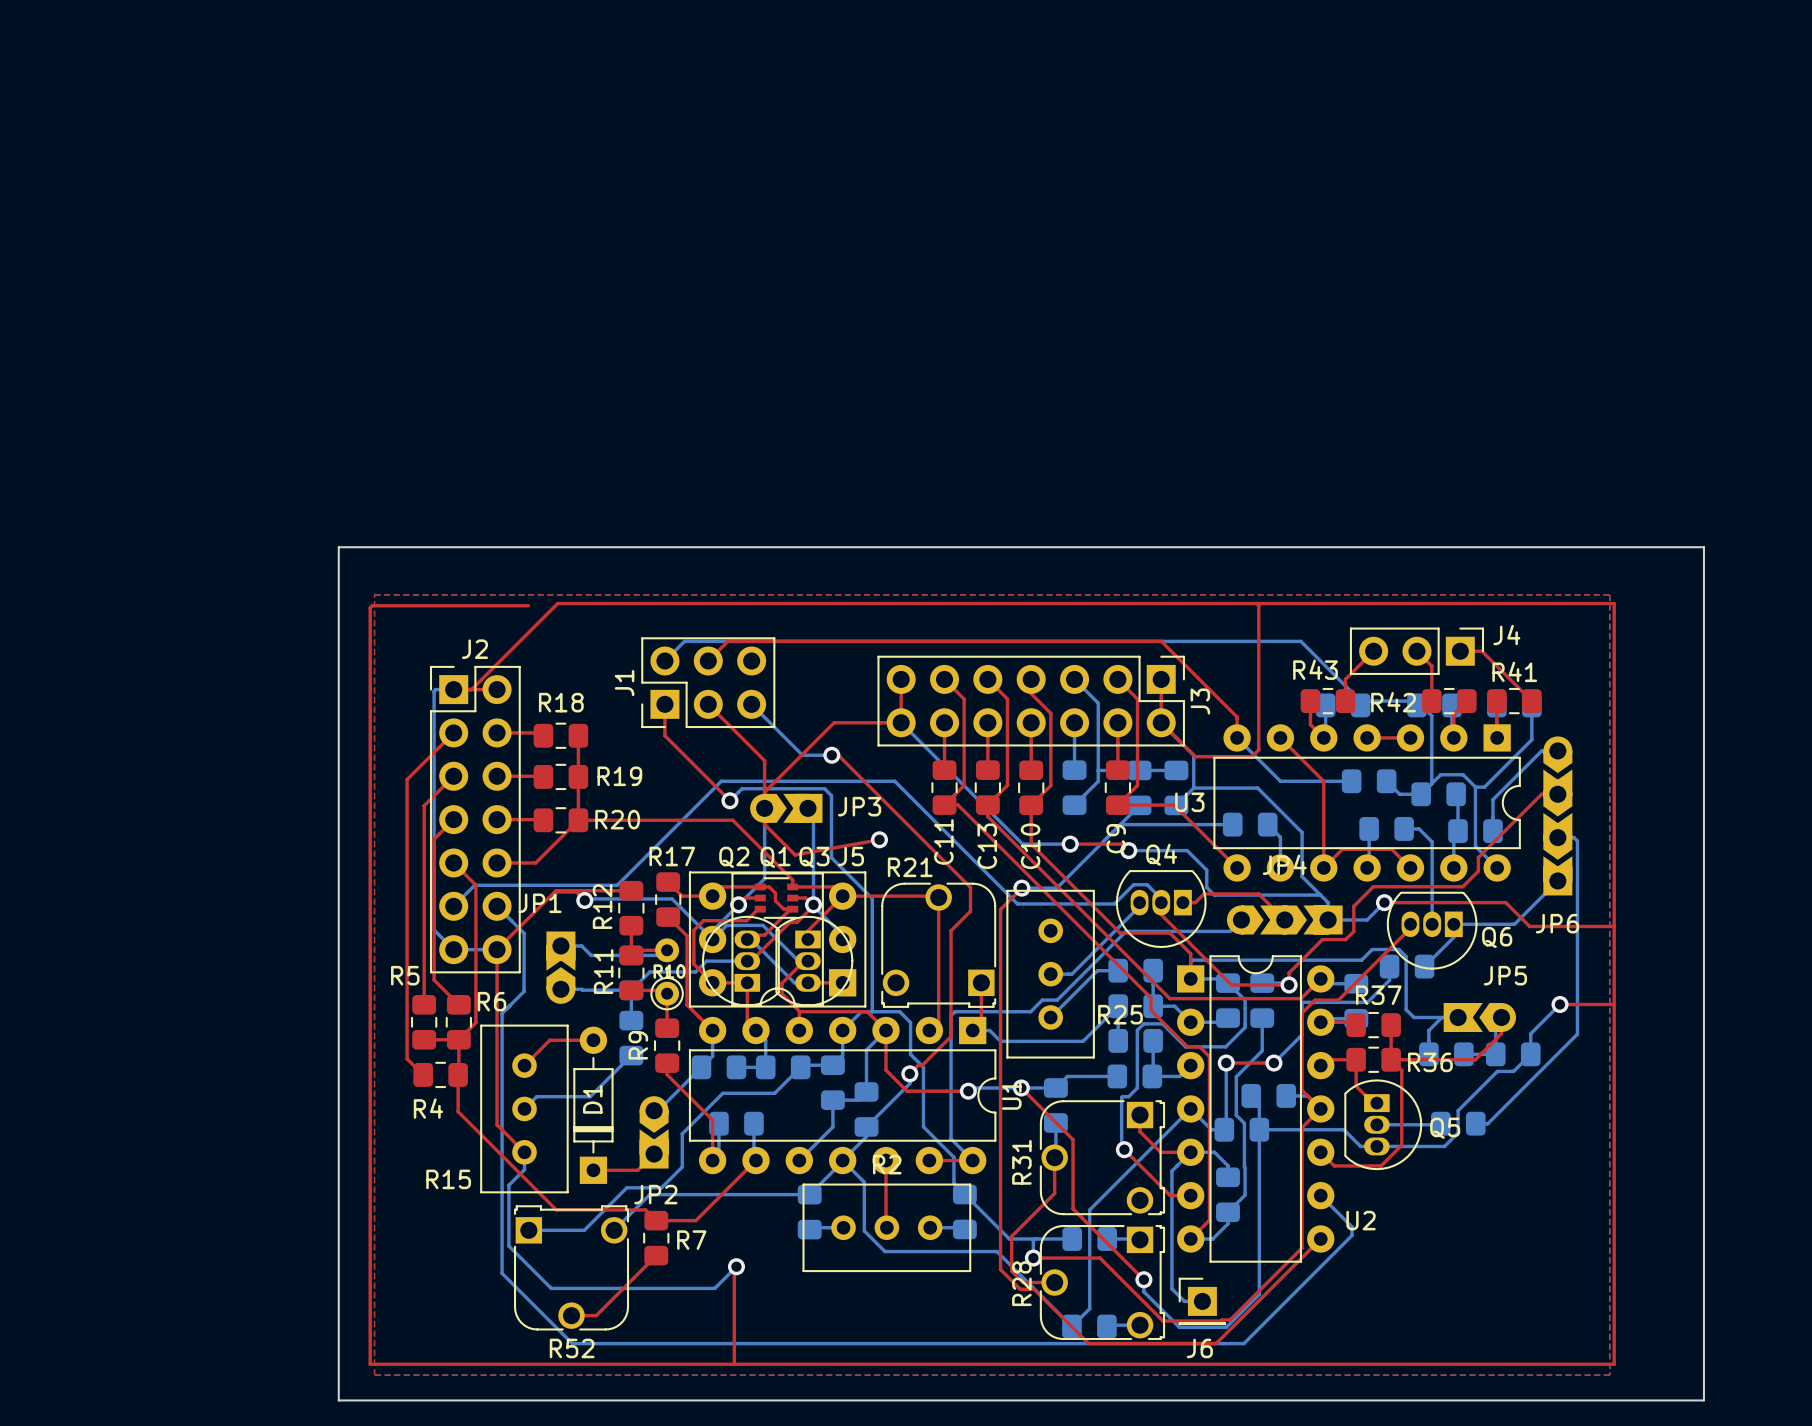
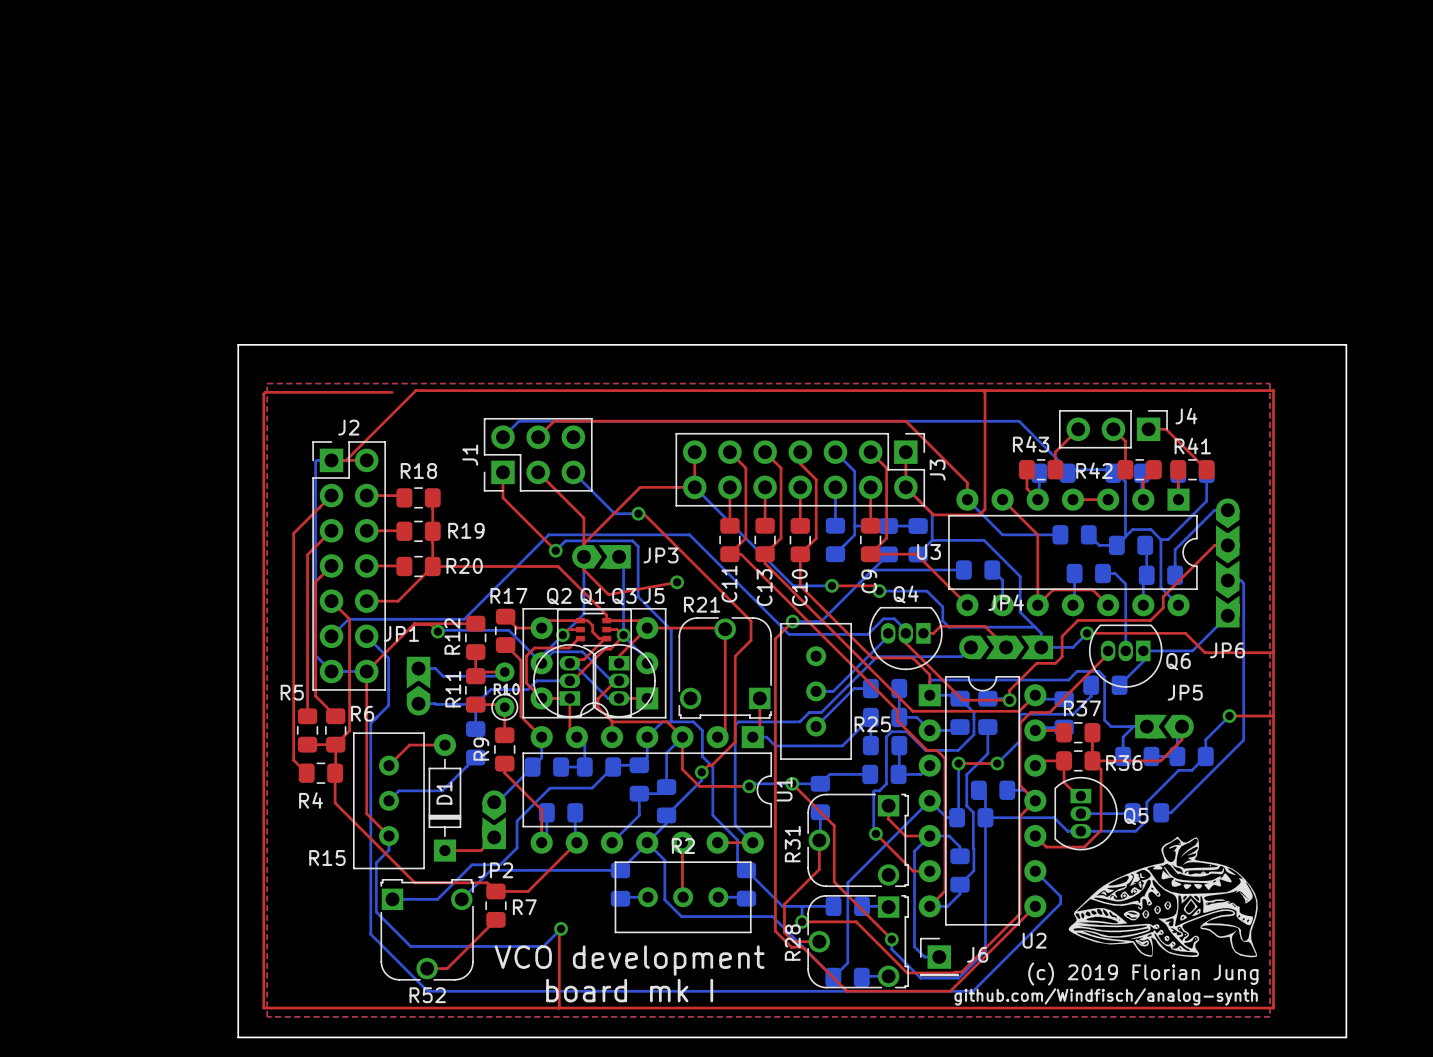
drawing: none -> [1068, 836, 1258, 958]
U2 name position: U2 (1361, 1220) -> U2 (1034, 940)
text: none -> VCO development (629, 960)
text: none -> (c) 2019 Florian Jung (1143, 974)
text: none -> board mk I (629, 990)
J6 name position: J6 (1199, 1348) -> J6 (977, 954)
text: none -> github.com/Windfisch/analog-synth (1106, 996)

